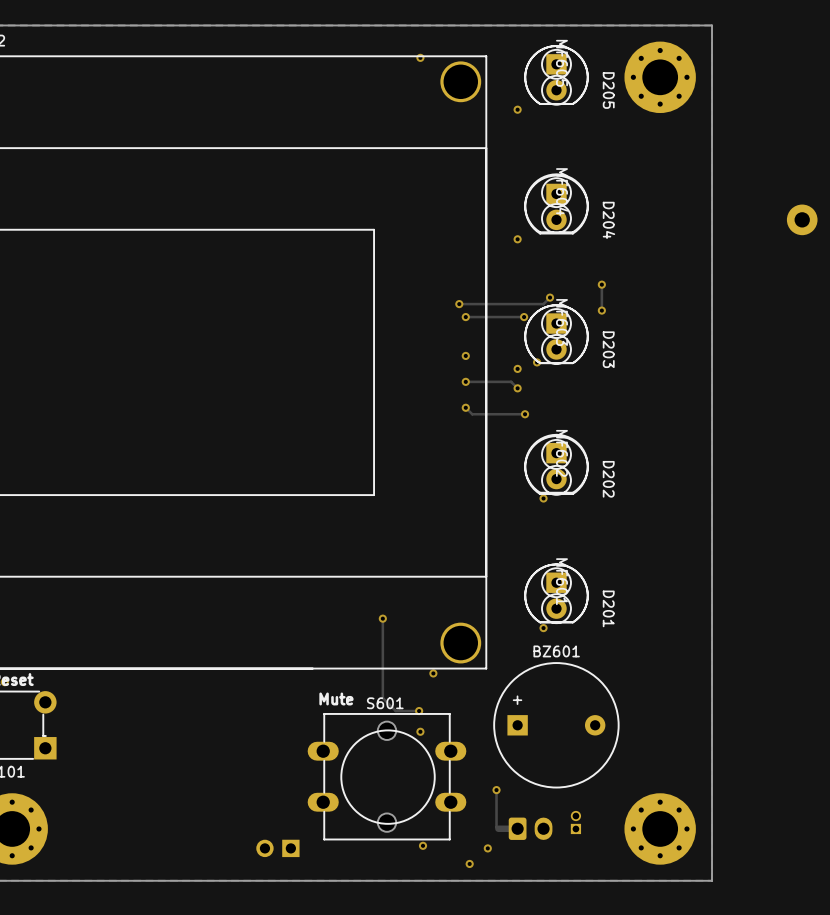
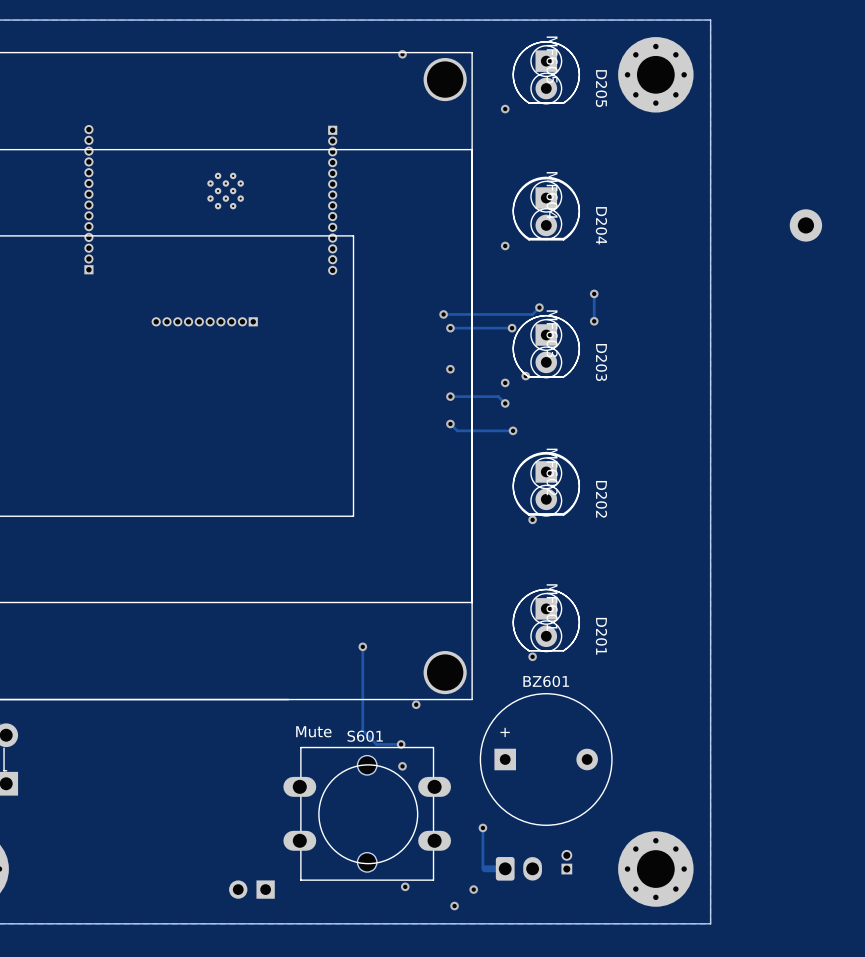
part: none -> (225, 191)
part: none -> (88, 199)
part: none -> (332, 200)
part: none -> (204, 321)

